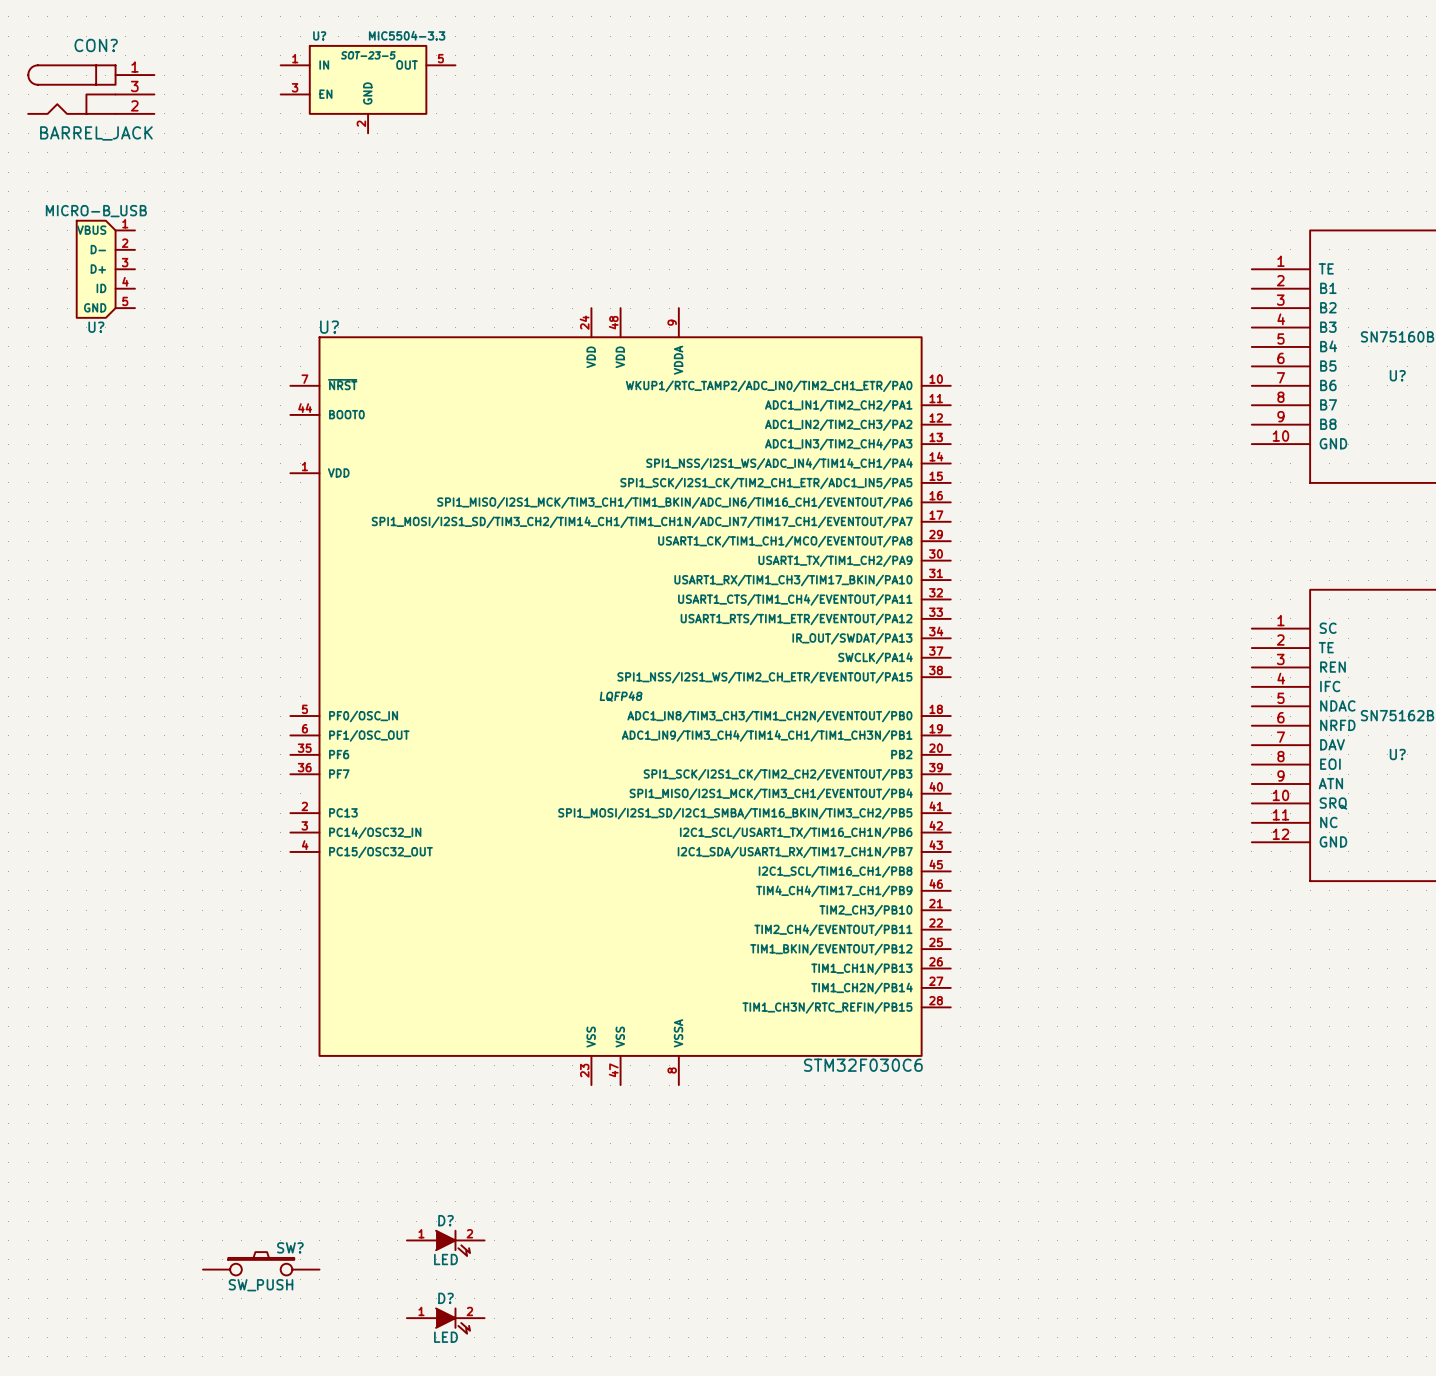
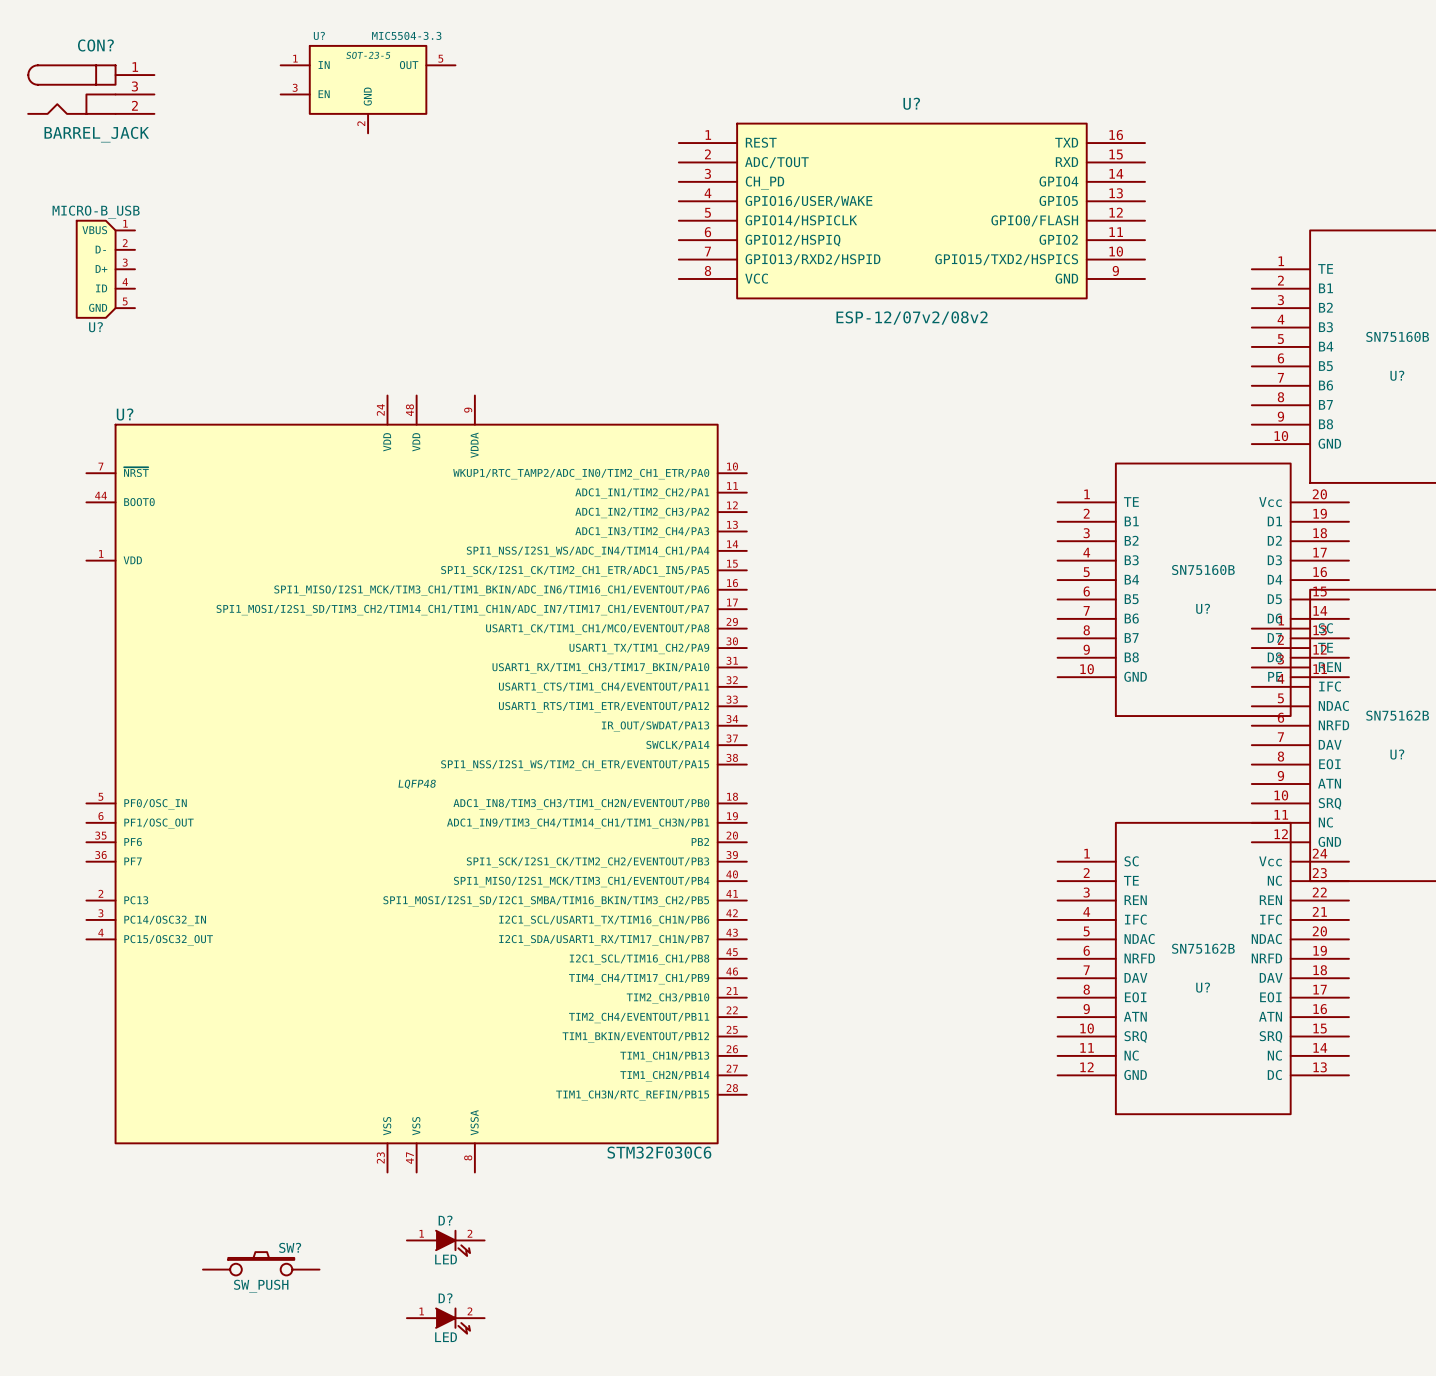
U?: none -> ESP-12/07v2/08v2 (911, 211)
U?: none -> SN75160B (1203, 589)
U?: STM32F030C6 (620, 696) -> none
U?: none -> STM32F030C6 (416, 784)
U?: none -> SN75162B (1203, 968)

